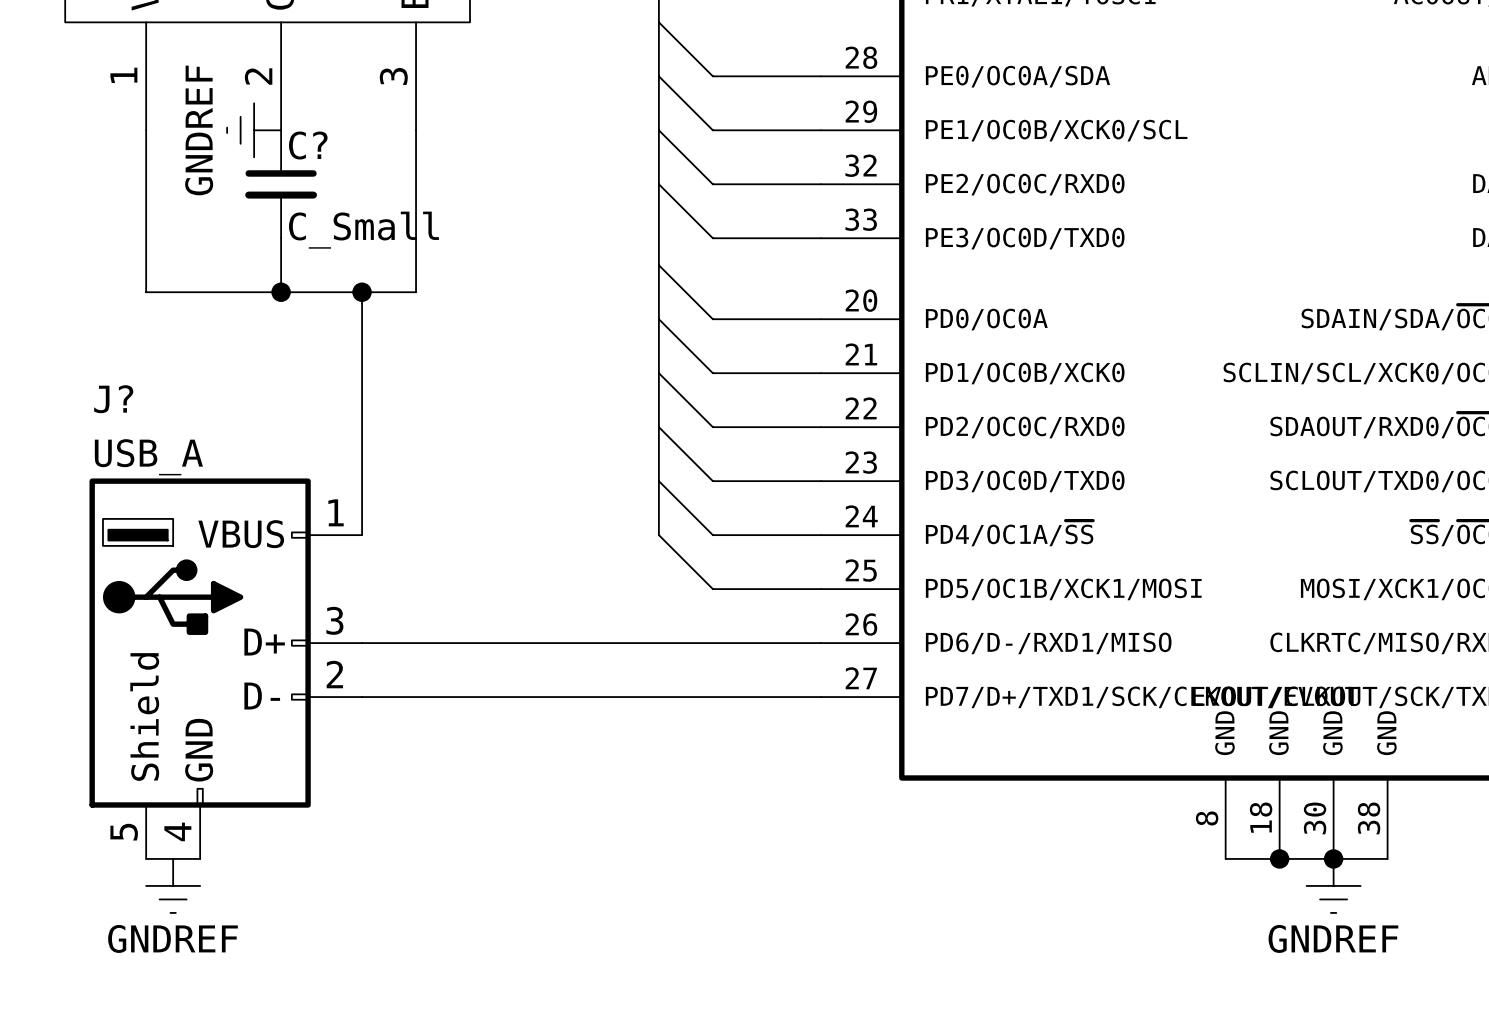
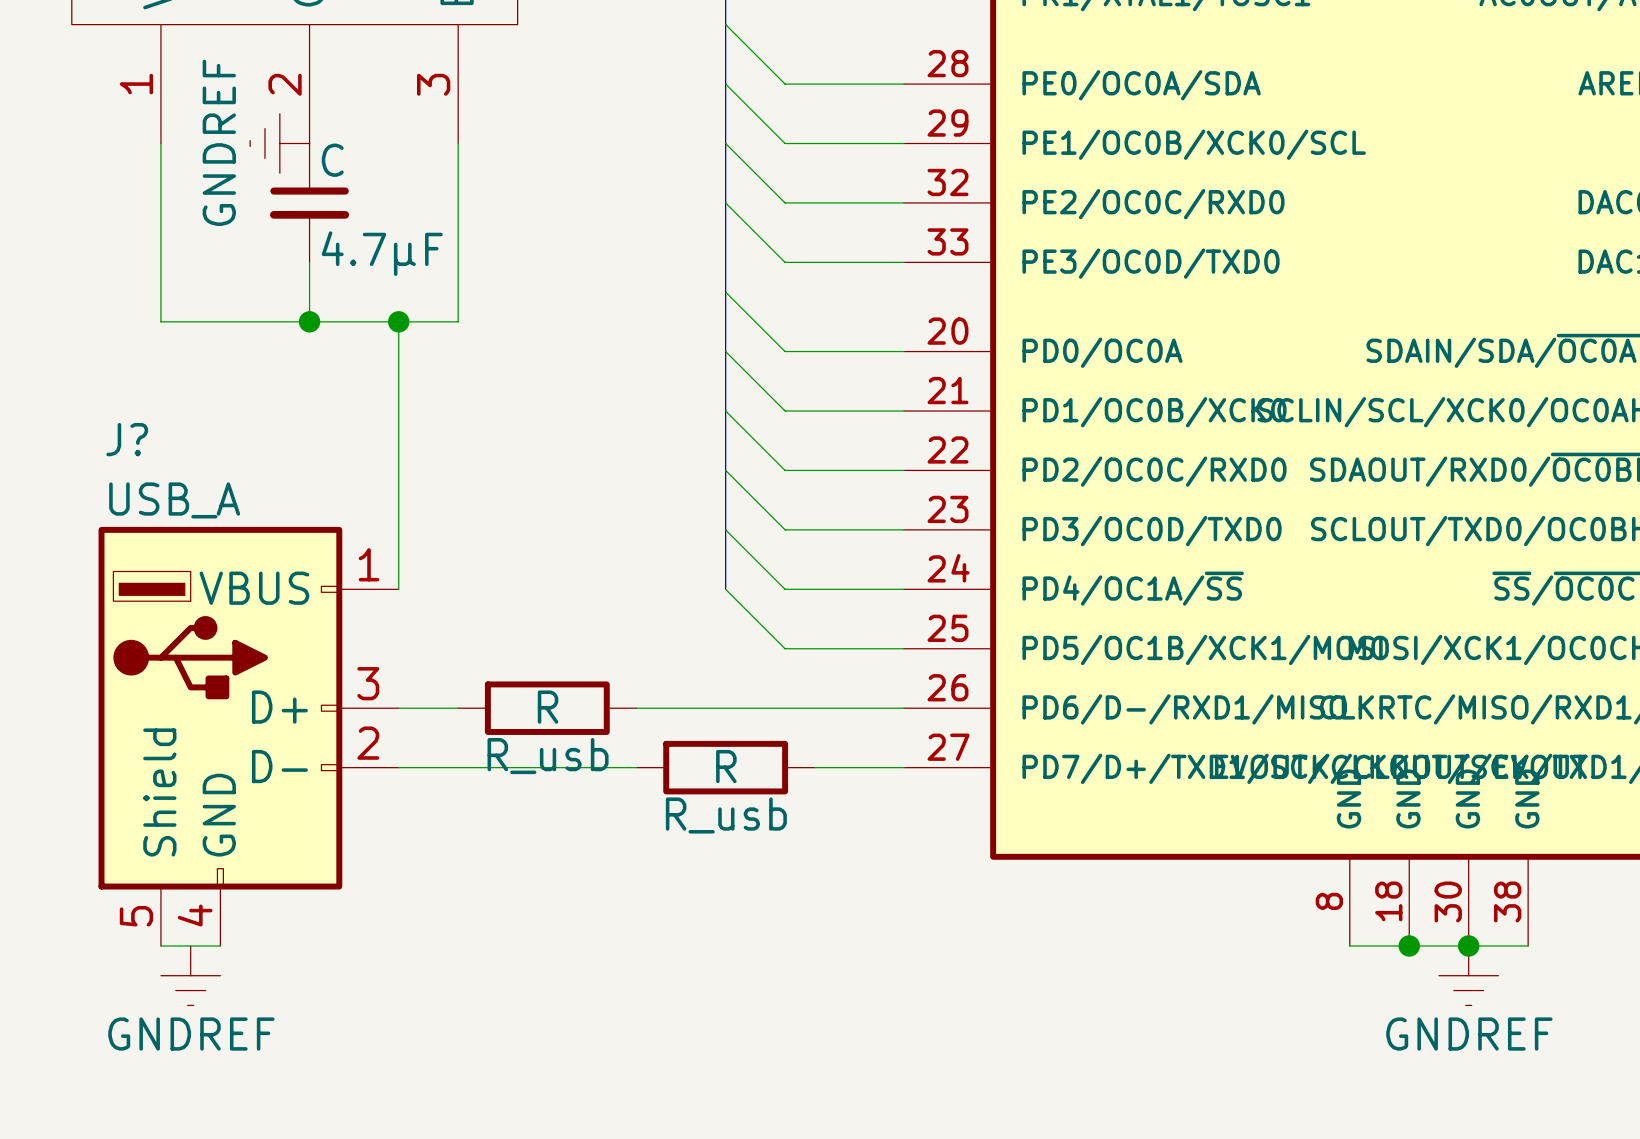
C? name: C? (308, 145) -> C (332, 160)
C? value: C_Small (363, 230) -> 4.7µF (382, 253)
wire: (416, 643) (577, 643) -> none
R_usb: none -> R (547, 708)
wire: (577, 697) (739, 697) -> none
R_usb: none -> R (725, 767)

